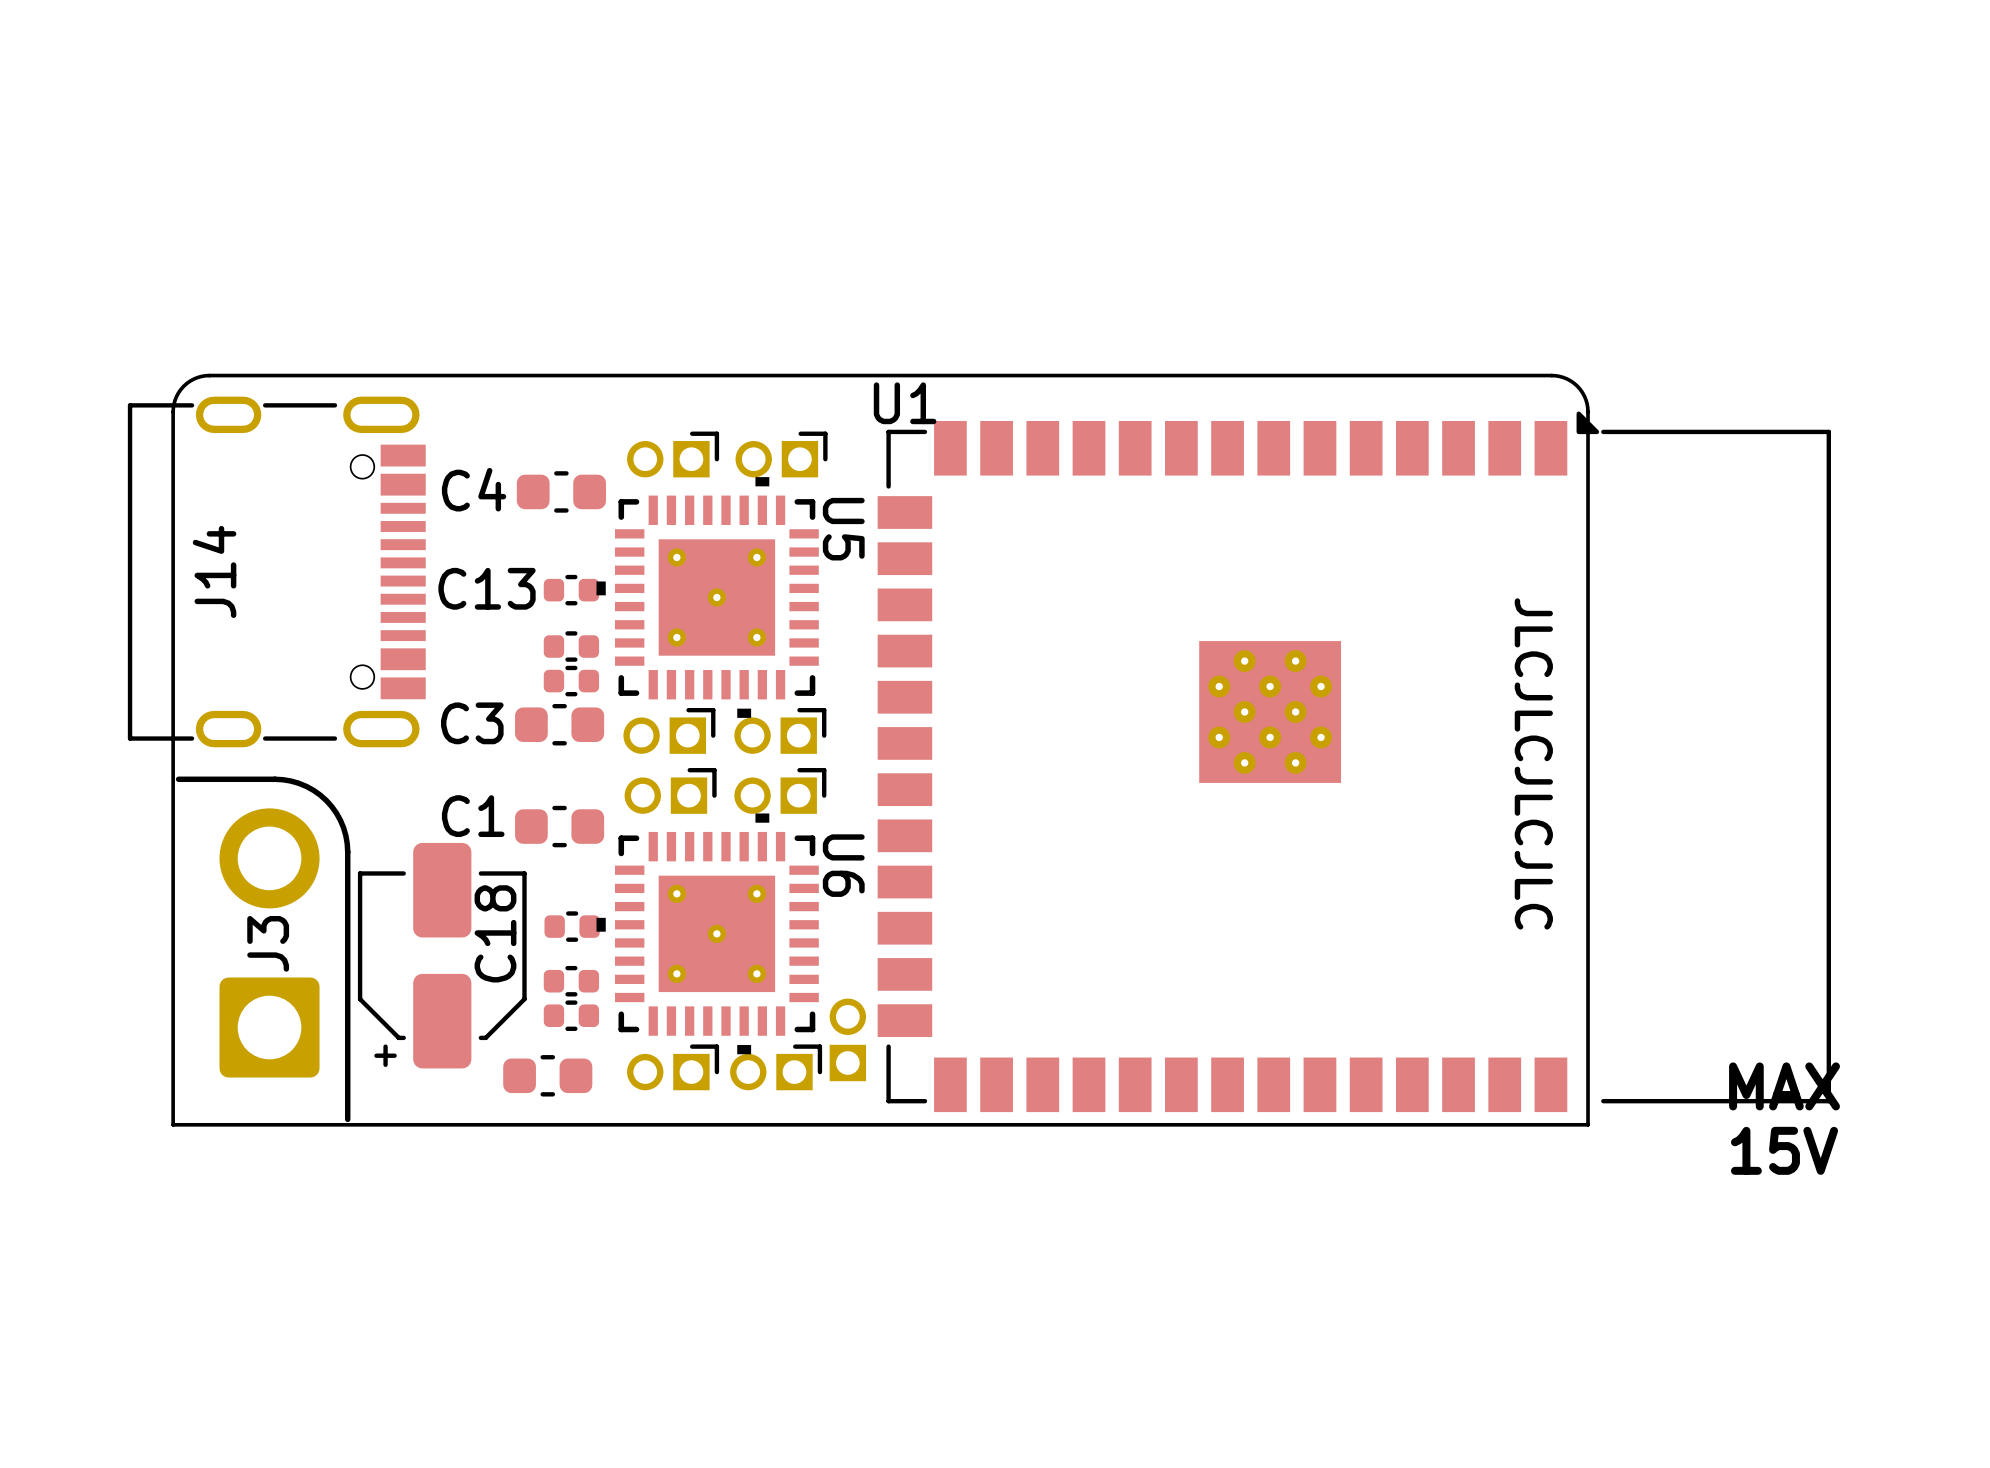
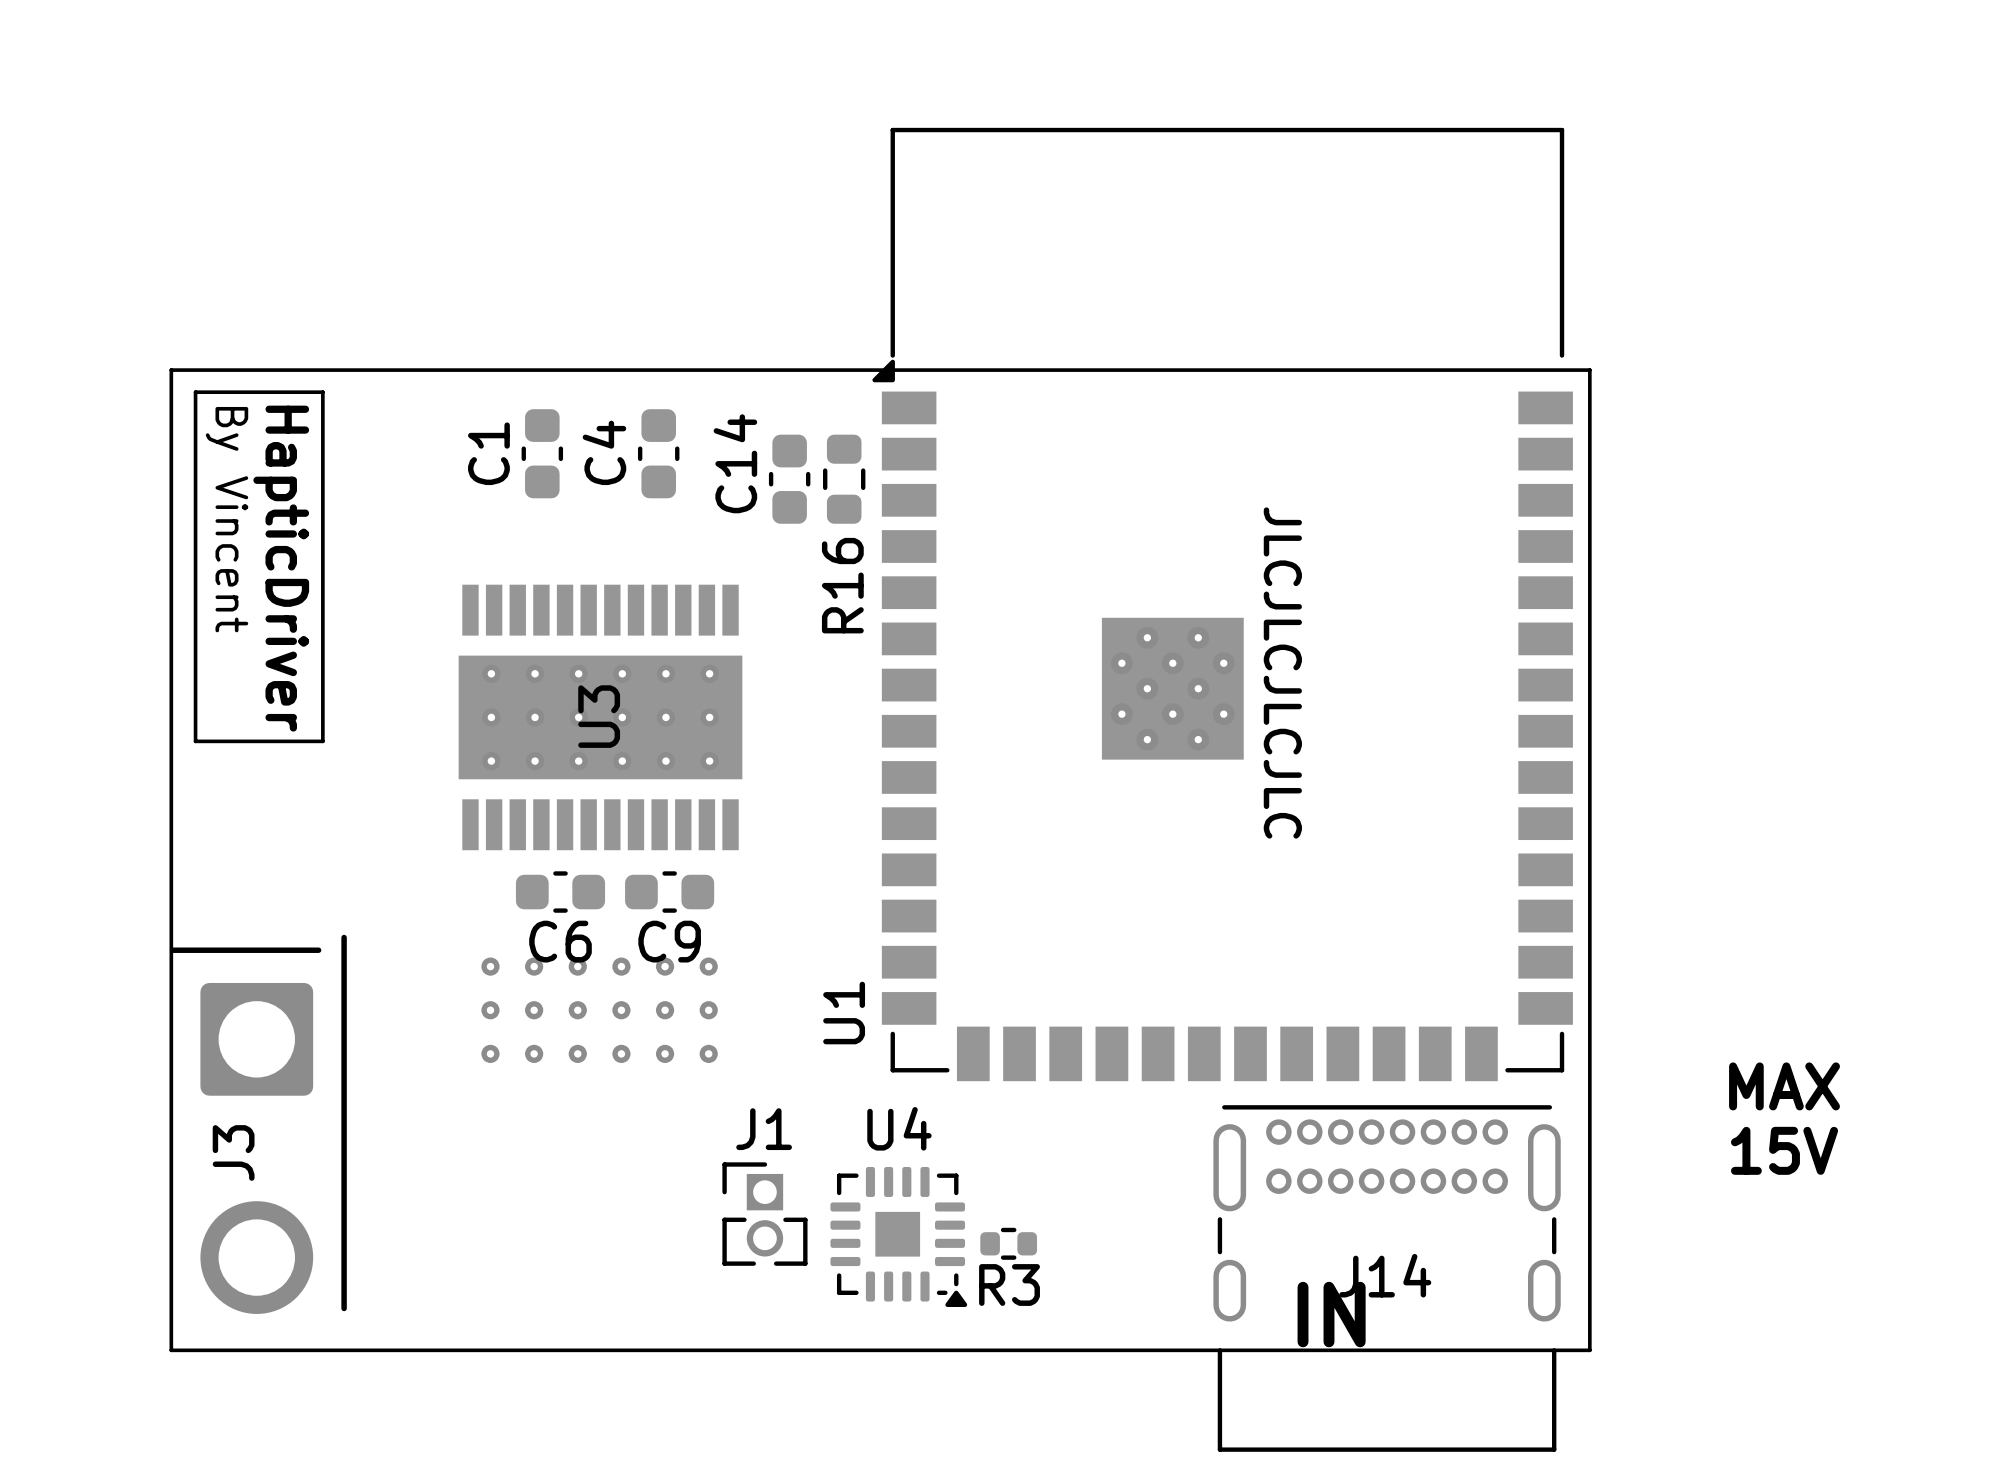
board edge: (209, 375) (1551, 375) (1567, 379) (1582, 392) (1588, 411) (1588, 1124) (173, 1124) (173, 411) (176, 396) (183, 386) (193, 379) (209, 375) -> (171, 370) (171, 1350) (1589, 1350) (1589, 370) (171, 370)
line: none -> (195, 392) (322, 392) (322, 741) (195, 741) (195, 392)
J14 footprint: [127, 396, 426, 748] -> [1213, 1105, 1561, 1452]
part: (673, 454) -> none
part: (781, 454) -> none
C14: none -> (789, 479)
R16: none -> (844, 479)
C4 rotation: 0° (561, 491) -> 90° clockwise (658, 453)
C4 position: (561, 491) -> (658, 453)
text: none -> By Vincent (227, 519)
text: none -> HapticDriver (281, 568)
C13: (571, 590) -> none
U5: (707, 597) -> none
part: (571, 646) -> none
part: (571, 681) -> none
U3: none -> (600, 717)
C3: (559, 724) -> none
part: (669, 730) -> none
part: (780, 730) -> none
U1 rotation: 0° (1354, 761) -> 90° counterclockwise (1222, 604)
text position: JLCJLCJLCJLC (1533, 763) -> JLCJLCJLCJLC (1282, 673)
line: (178, 779) (274, 779) (291, 781) (306, 786) (320, 795) (331, 806) (340, 820) (345, 835) (347, 852) (347, 1119) -> none
part: (670, 790) -> none
part: (780, 790) -> none
J3 footprint: [219, 808, 320, 1078] -> [200, 982, 314, 1314]
C1 rotation: 0° (559, 826) -> 90° clockwise (542, 453)
C1 position: (559, 826) -> (542, 453)
C6: none -> (560, 892)
C9: none -> (669, 892)
part: (572, 926) -> none
U6: (707, 933) -> none
line: none -> (344, 937) (344, 1308)
line: none -> (173, 950) (318, 950)
C18: (442, 955) -> none
part: (571, 981) -> none
part: none -> (599, 1010)
part: (571, 1015) -> none
J1 side: bottom (847, 1039) -> top (764, 1214)
part: (673, 1067) -> none
part: (776, 1067) -> none
part: (547, 1075) -> none
U4: none -> (898, 1236)
R3: none -> (1008, 1243)
text: none -> IN (1331, 1314)

